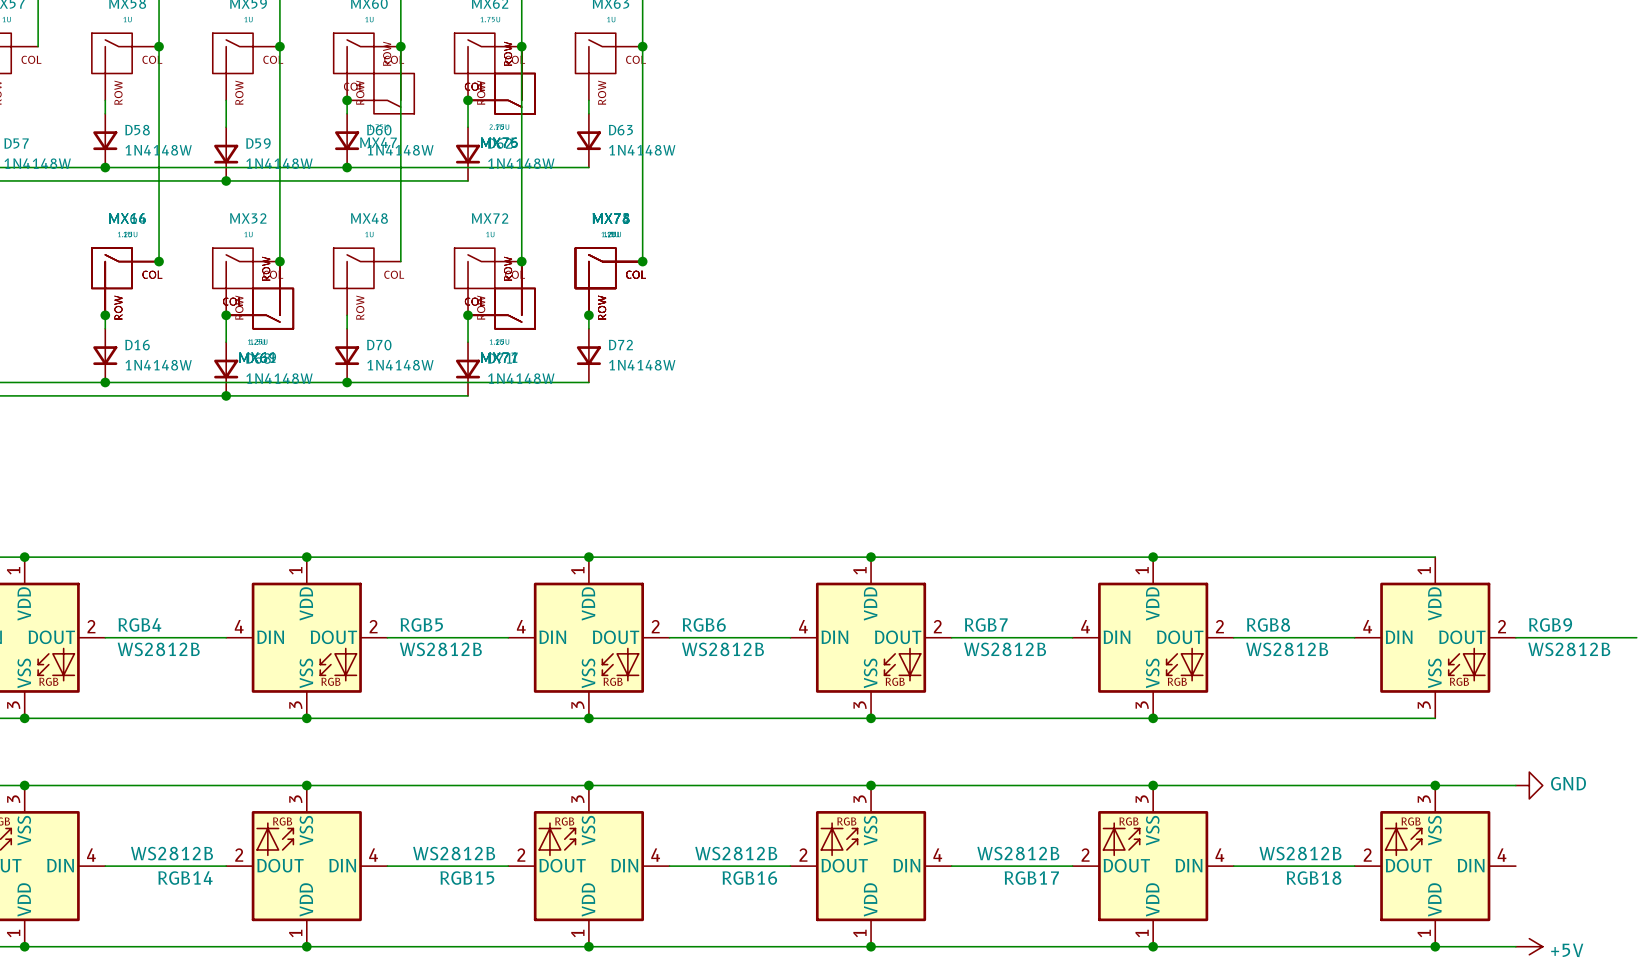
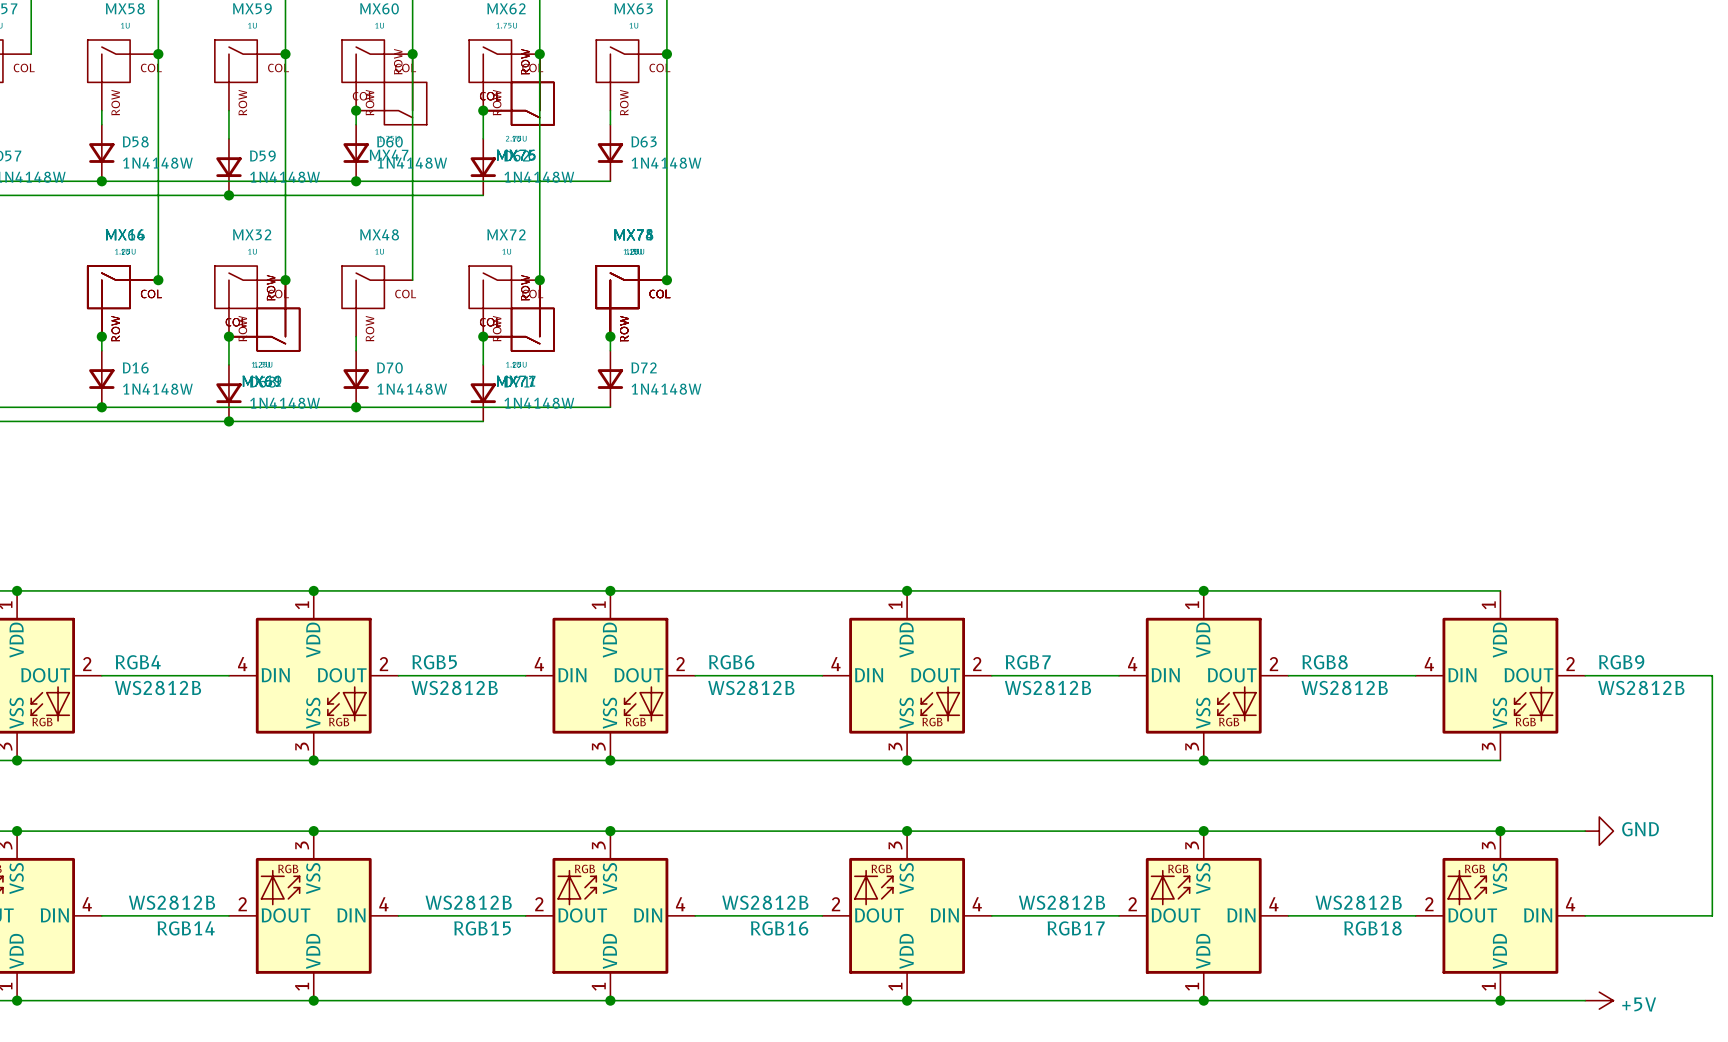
wire: none -> (1712, 675) (1712, 915) (1585, 915)

